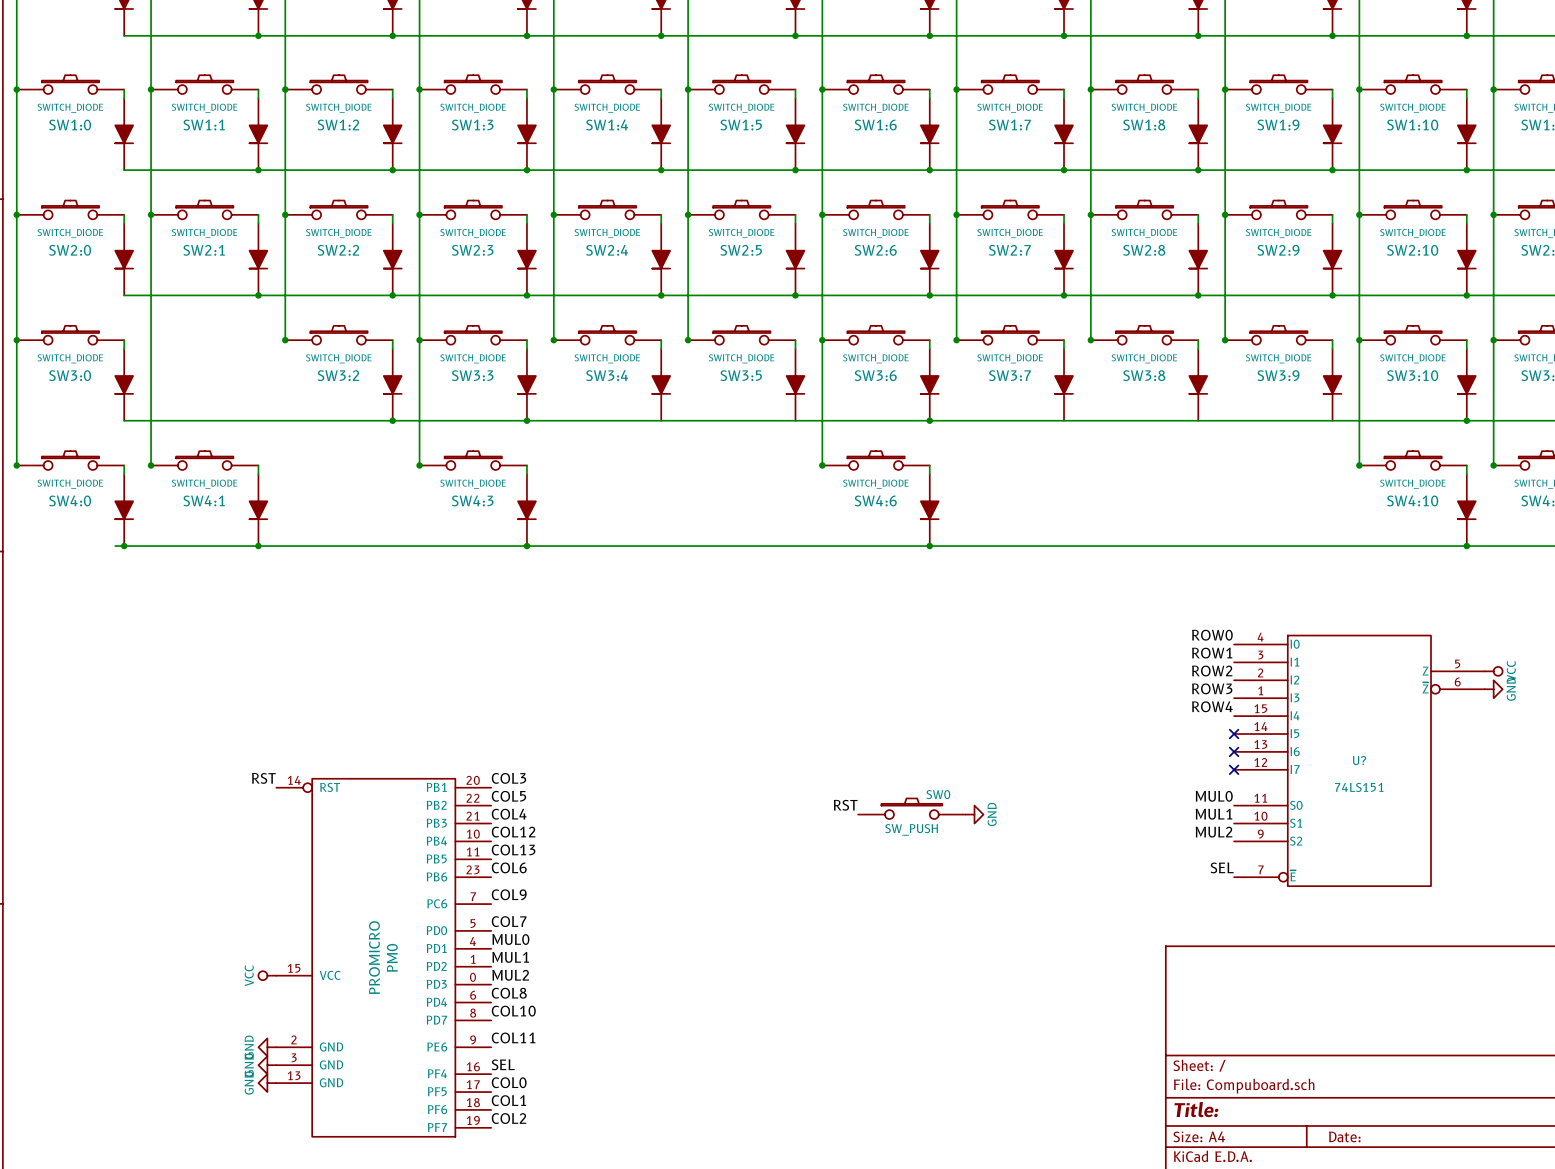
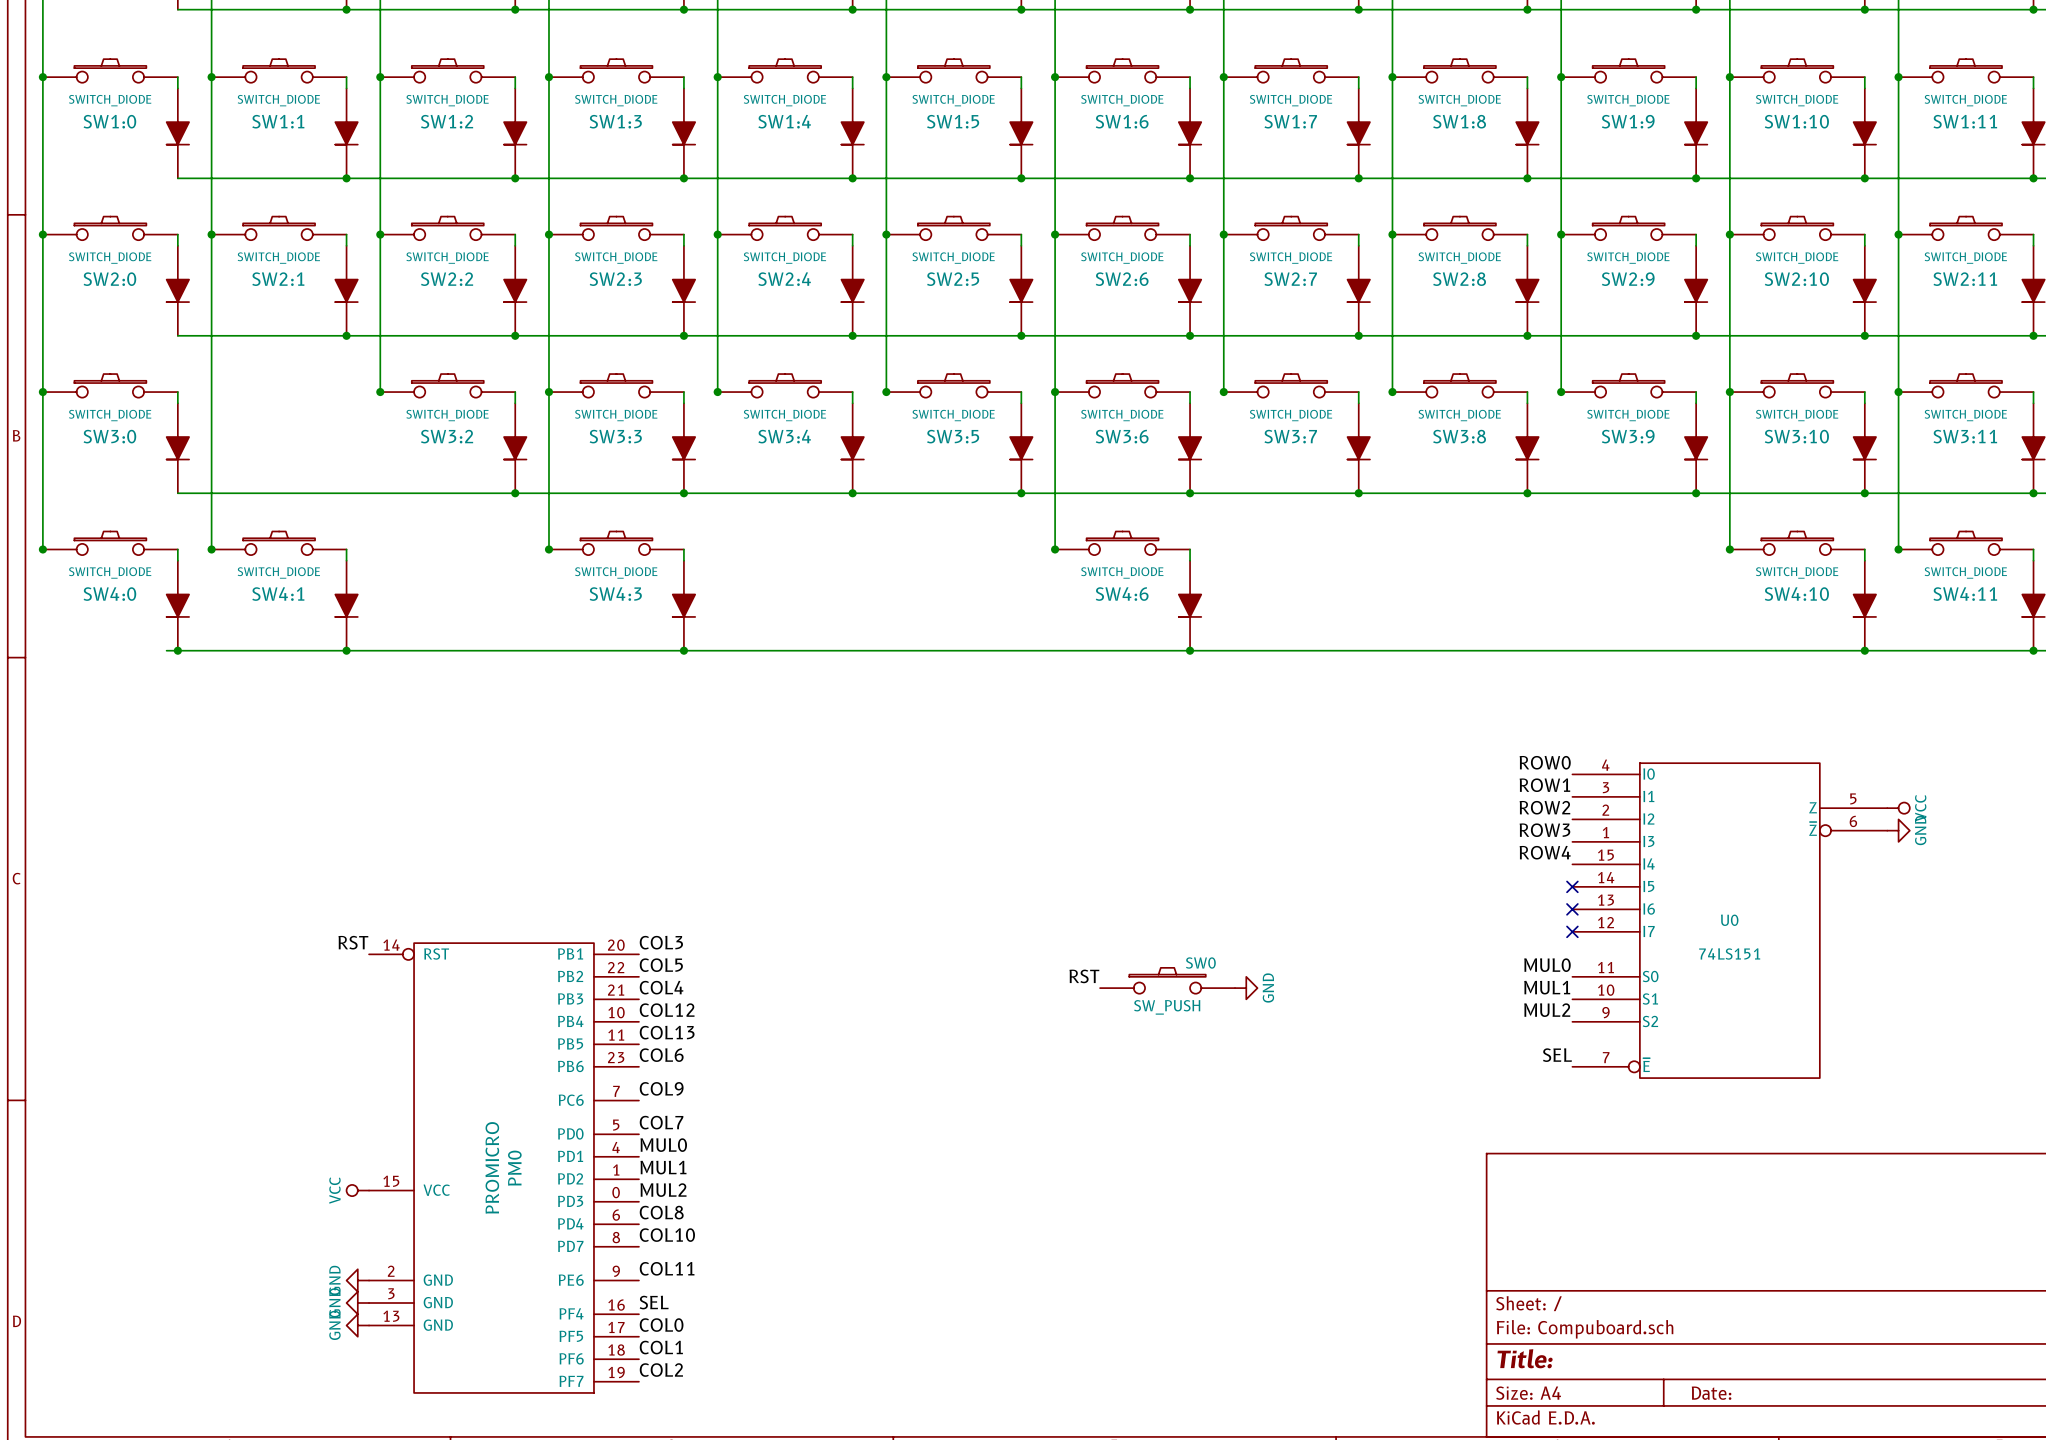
junction: none -> (852, 493)
junction: none -> (1021, 493)
junction: none -> (1358, 493)
junction: none -> (1527, 493)
junction: none -> (1696, 493)
U? name: U? (1359, 760) -> U0 (1729, 920)

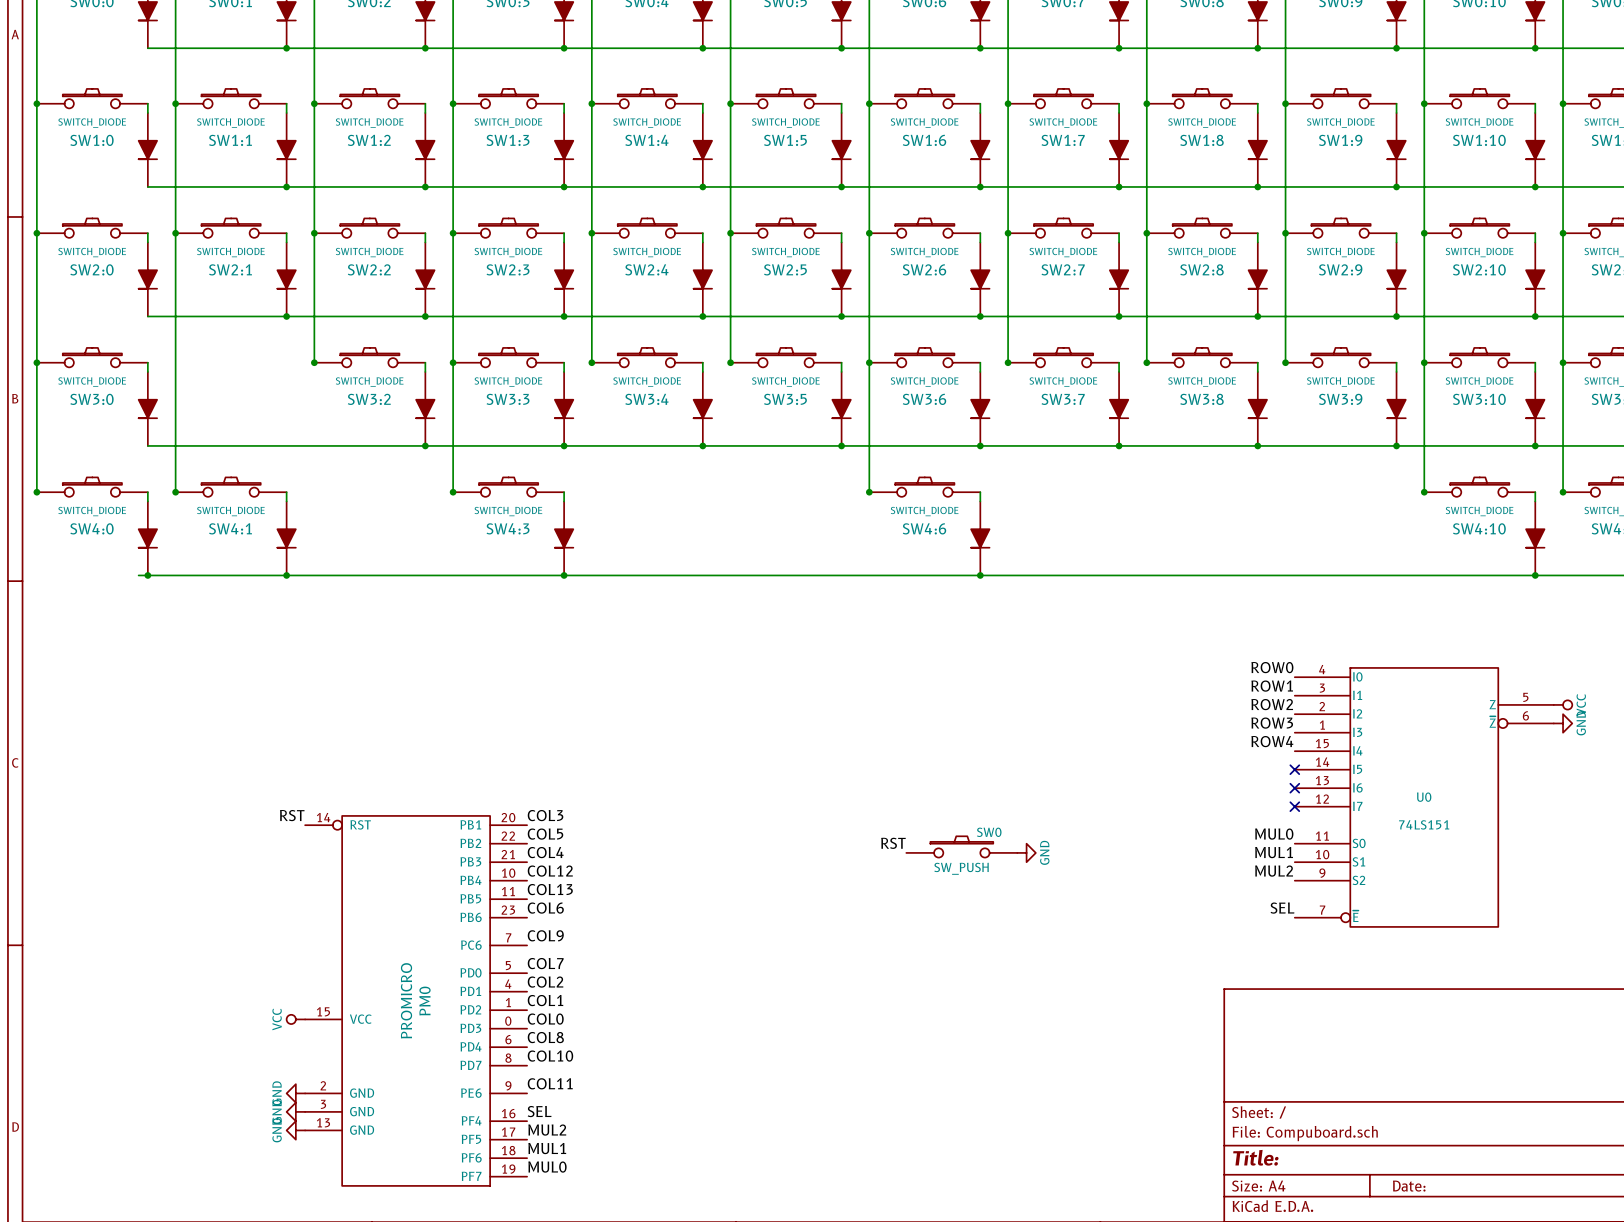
label: MUL0 (663, 1145) -> COL2 (545, 982)
label: MUL1 (663, 1167) -> COL1 (545, 1000)
label: MUL2 (663, 1190) -> COL0 (545, 1019)
label: COL0 (661, 1325) -> MUL2 (547, 1130)
label: COL1 (661, 1347) -> MUL1 (547, 1148)
label: COL2 (661, 1370) -> MUL0 (547, 1167)

